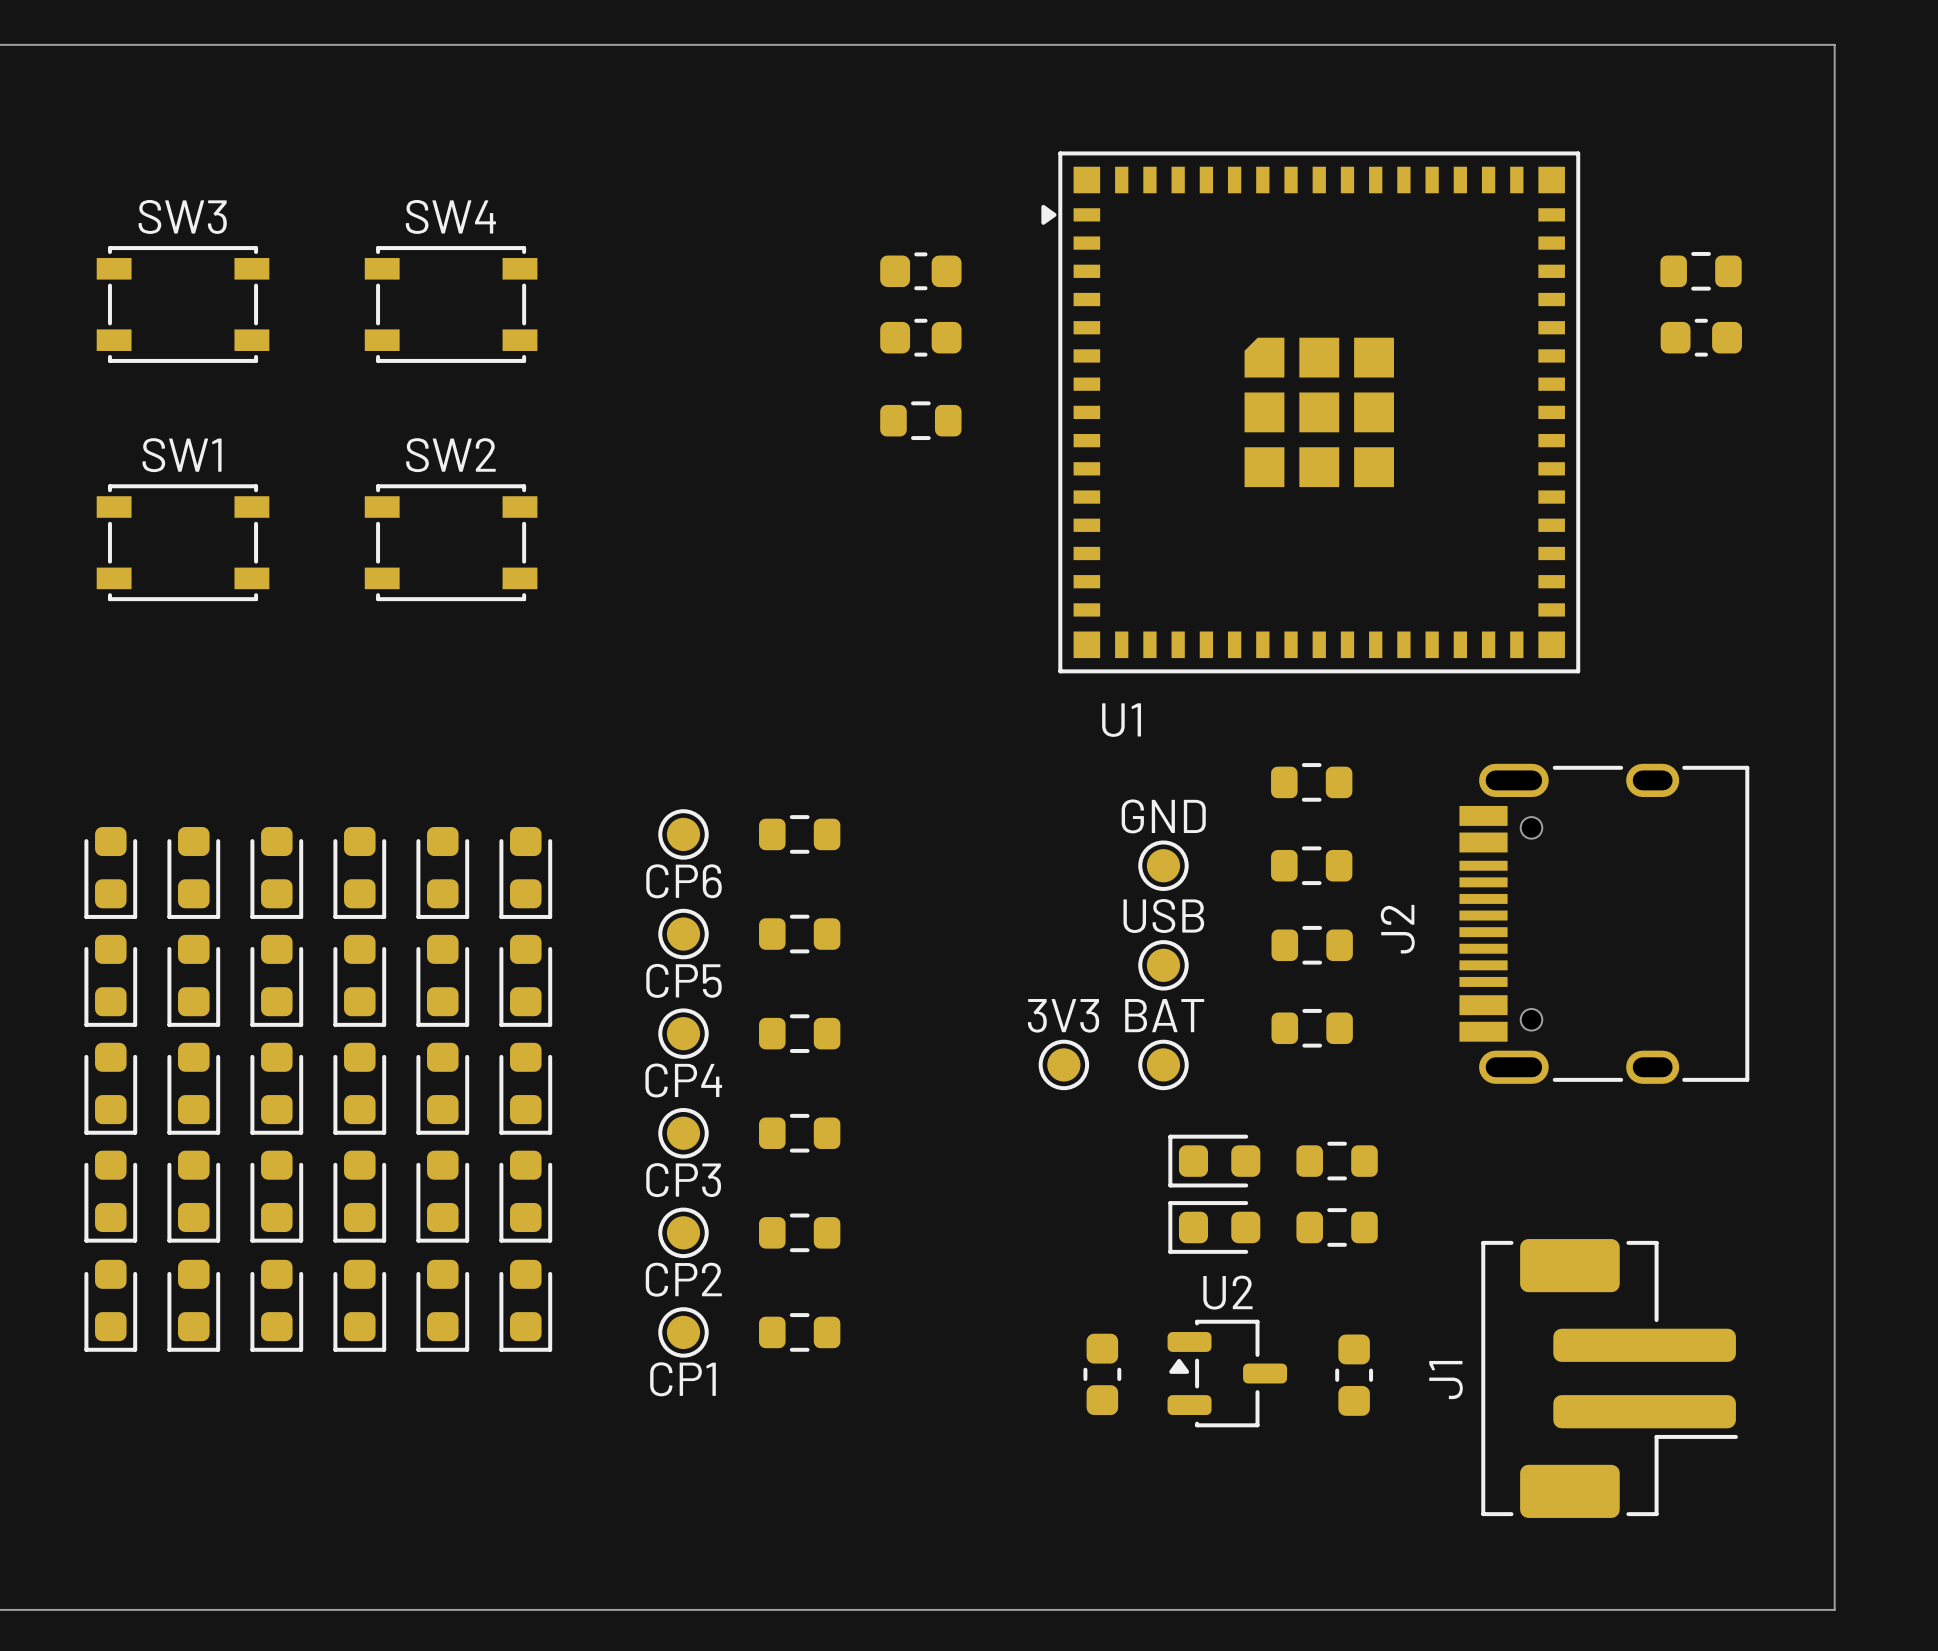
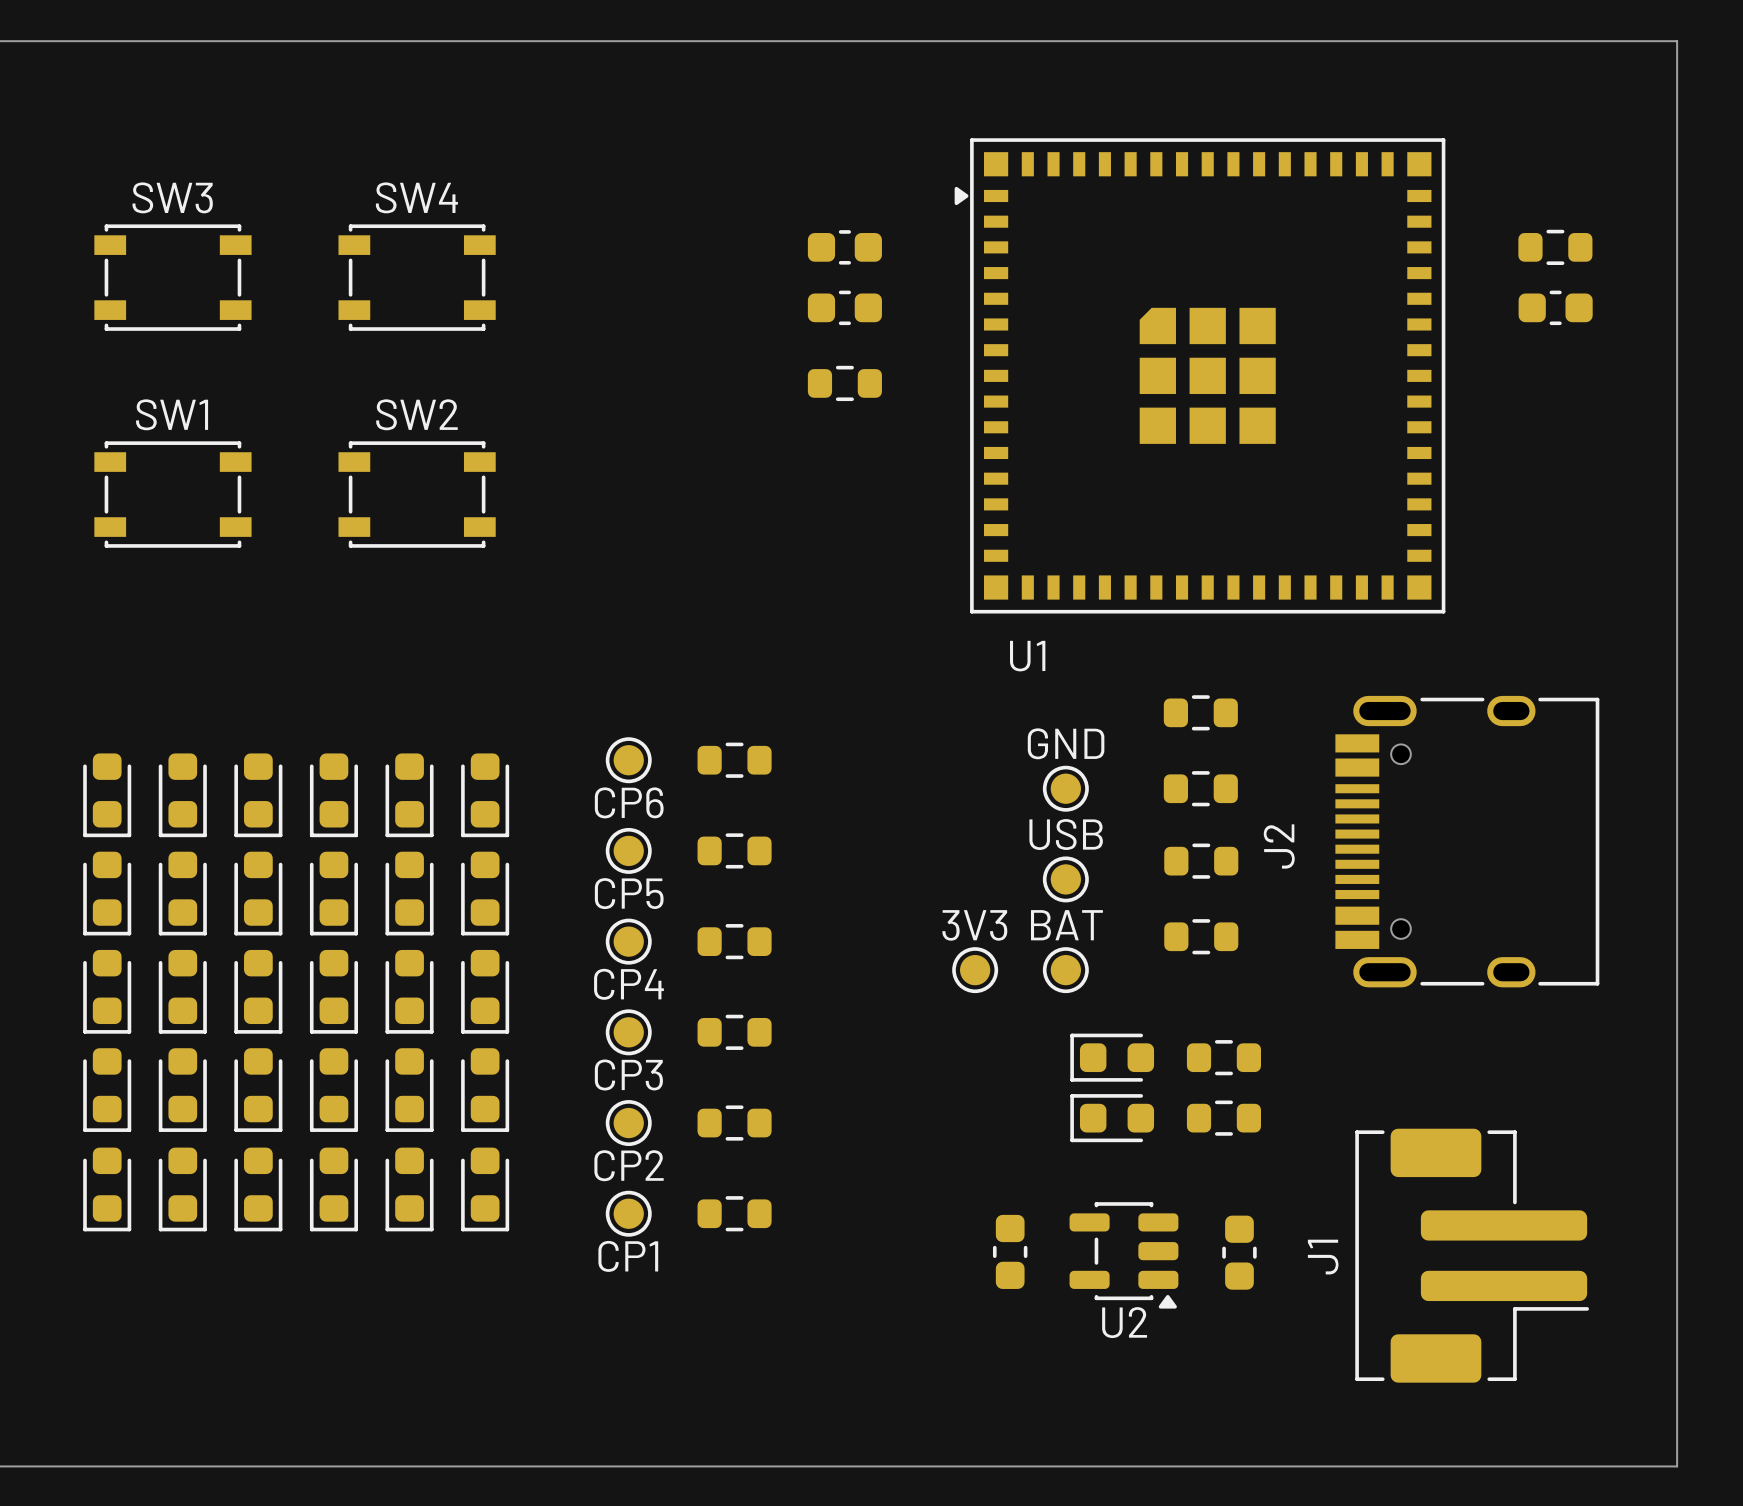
U2 name position: U2 (1227, 1292) -> U2 (1124, 1322)
U2 footprint: [1167, 1319, 1288, 1428] -> [1069, 1202, 1179, 1309]

